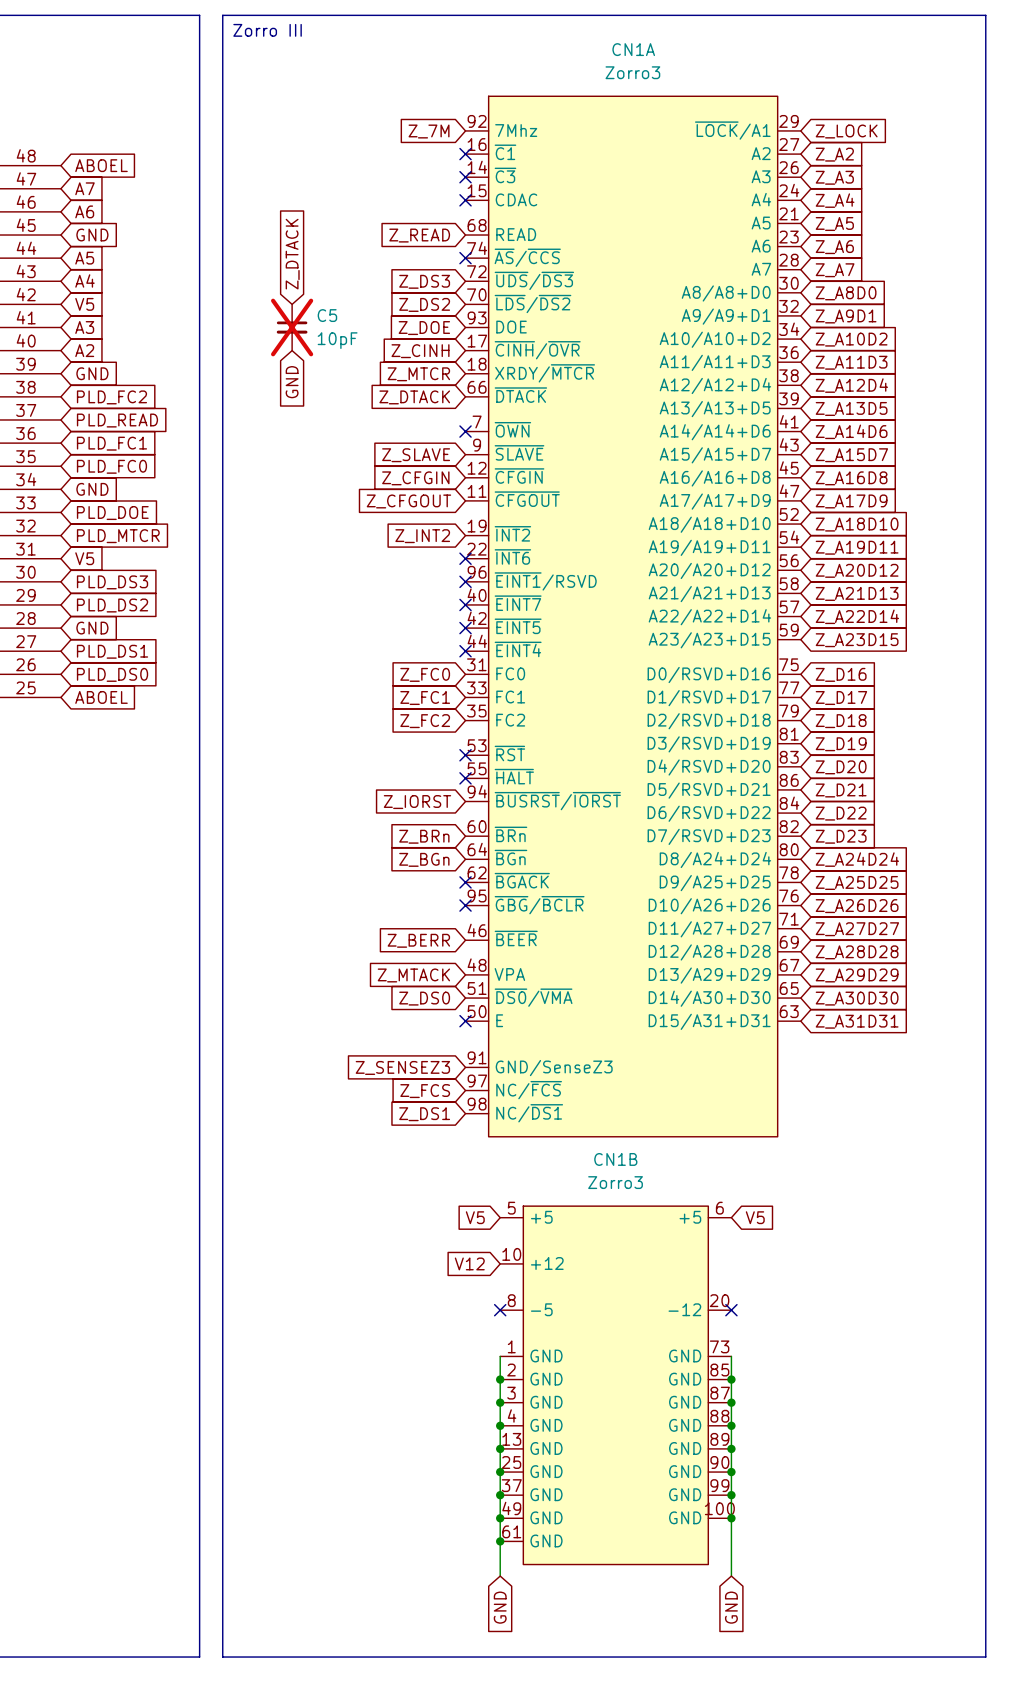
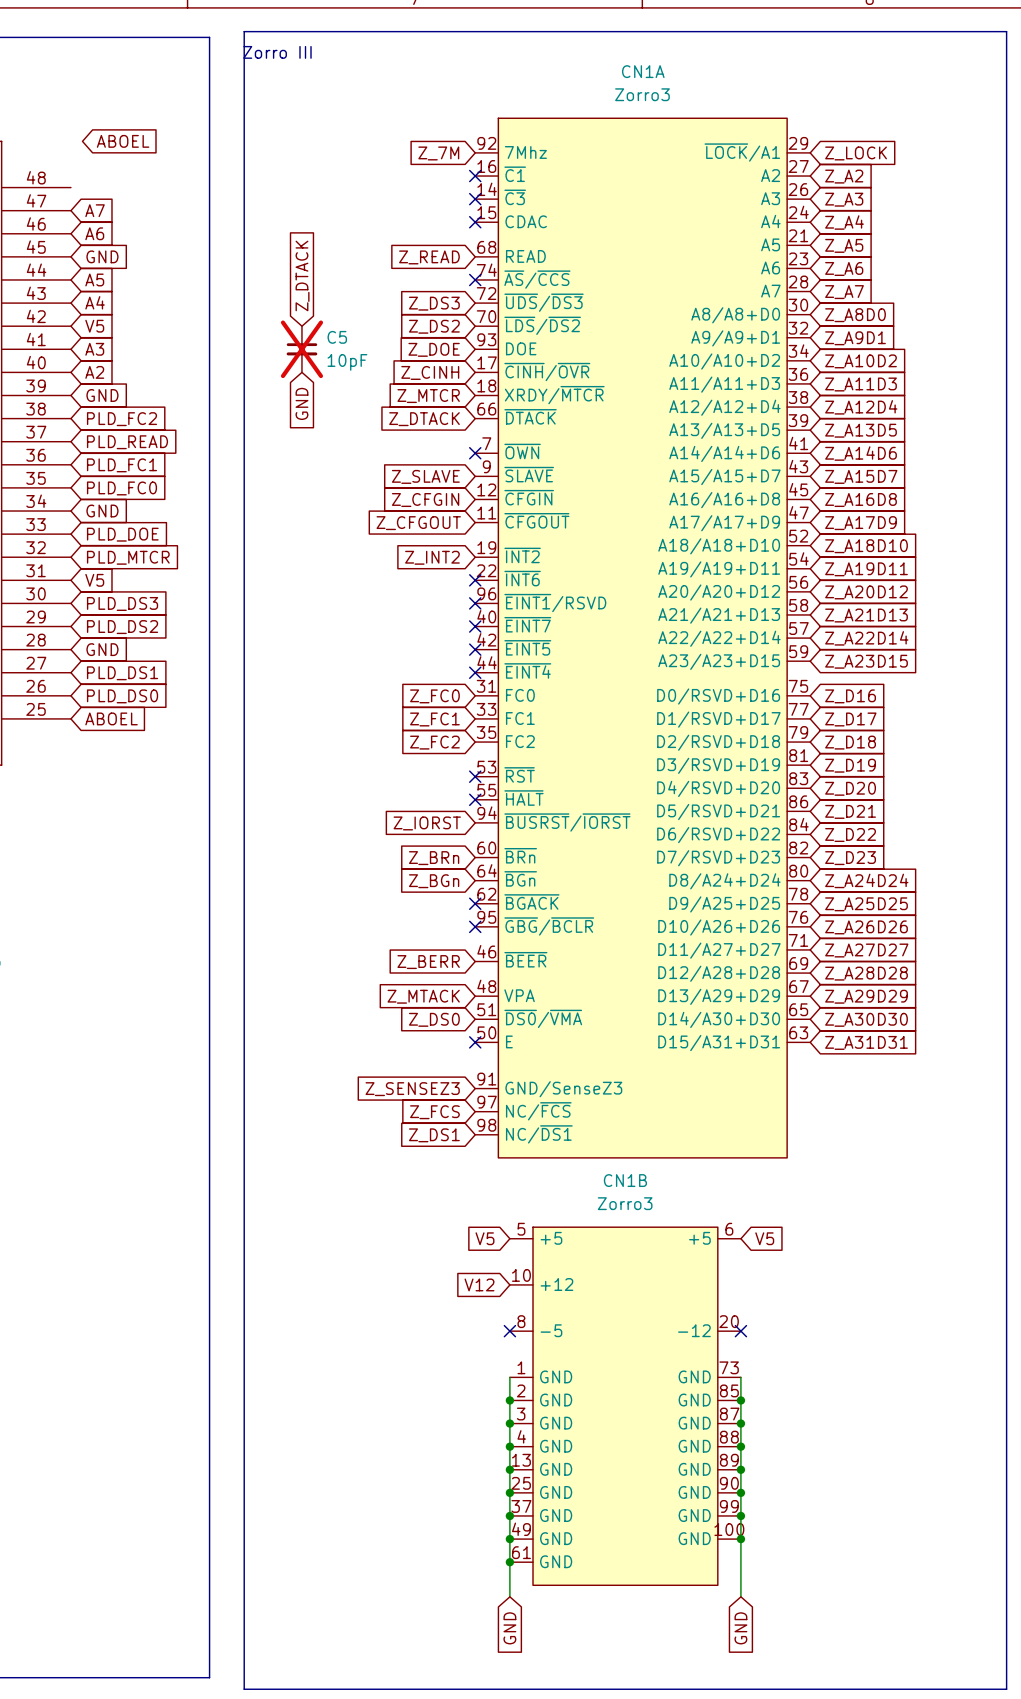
line: (222, 15) (985, 15) (985, 1657) (222, 1657) (222, 15) -> (244, 31) (244, 1689) (1006, 1689) (1006, 31) (244, 31)
global label position: ABOEL (101, 165) -> ABOEL (123, 141)

